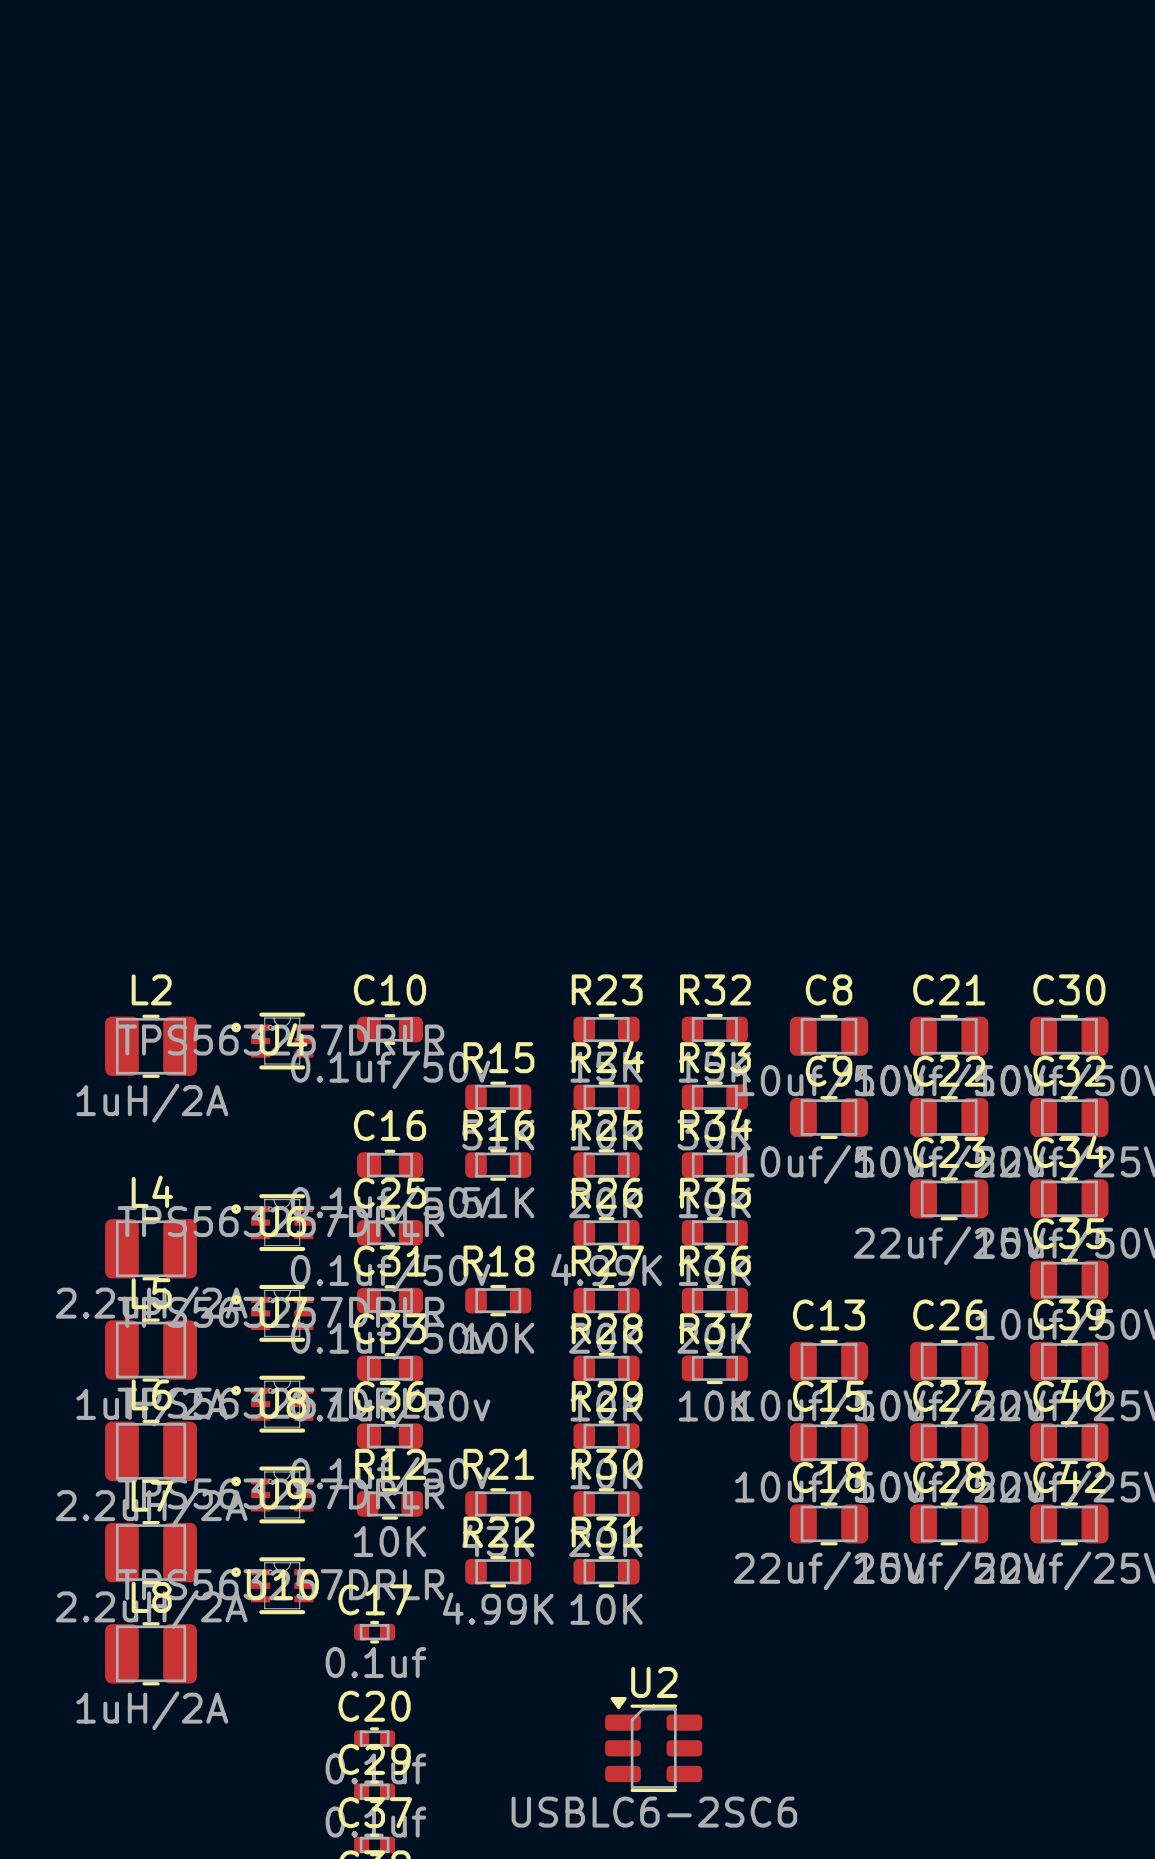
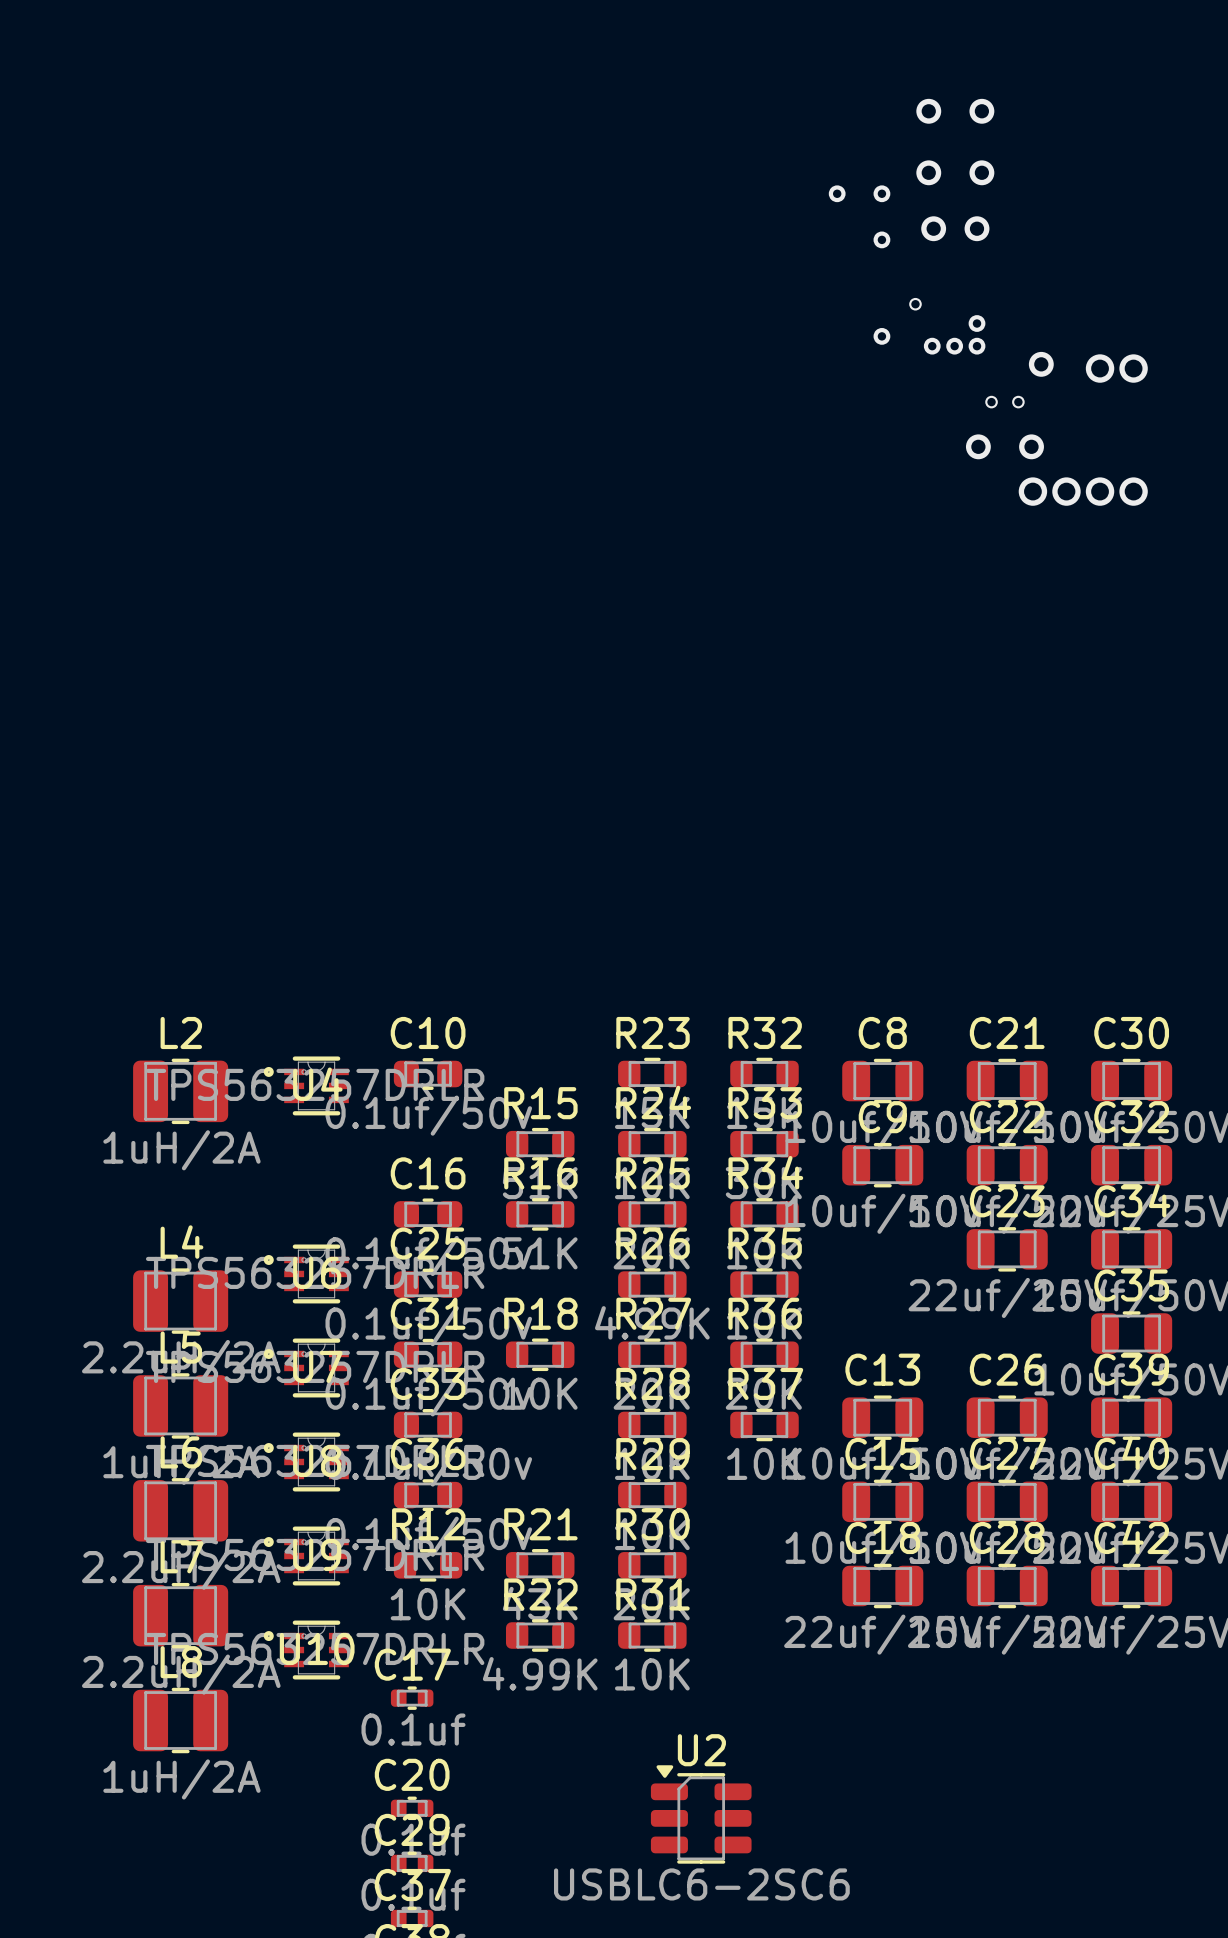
via: none -> (928, 111)
via: none -> (981, 111)
via: none -> (928, 172)
via: none -> (981, 172)
via: none -> (837, 193)
via: none -> (881, 193)
via: none -> (933, 228)
via: none -> (977, 228)
via: none -> (881, 239)
via: none -> (915, 304)
via: none -> (977, 323)
via: none -> (881, 336)
via: none -> (932, 346)
via: none -> (954, 346)
via: none -> (977, 346)
via: none -> (1041, 364)
via: none -> (1100, 368)
via: none -> (1133, 368)
via: none -> (991, 402)
via: none -> (1018, 402)
via: none -> (978, 446)
via: none -> (1031, 446)
via: none -> (1032, 491)
via: none -> (1066, 491)
via: none -> (1100, 491)
via: none -> (1133, 491)

